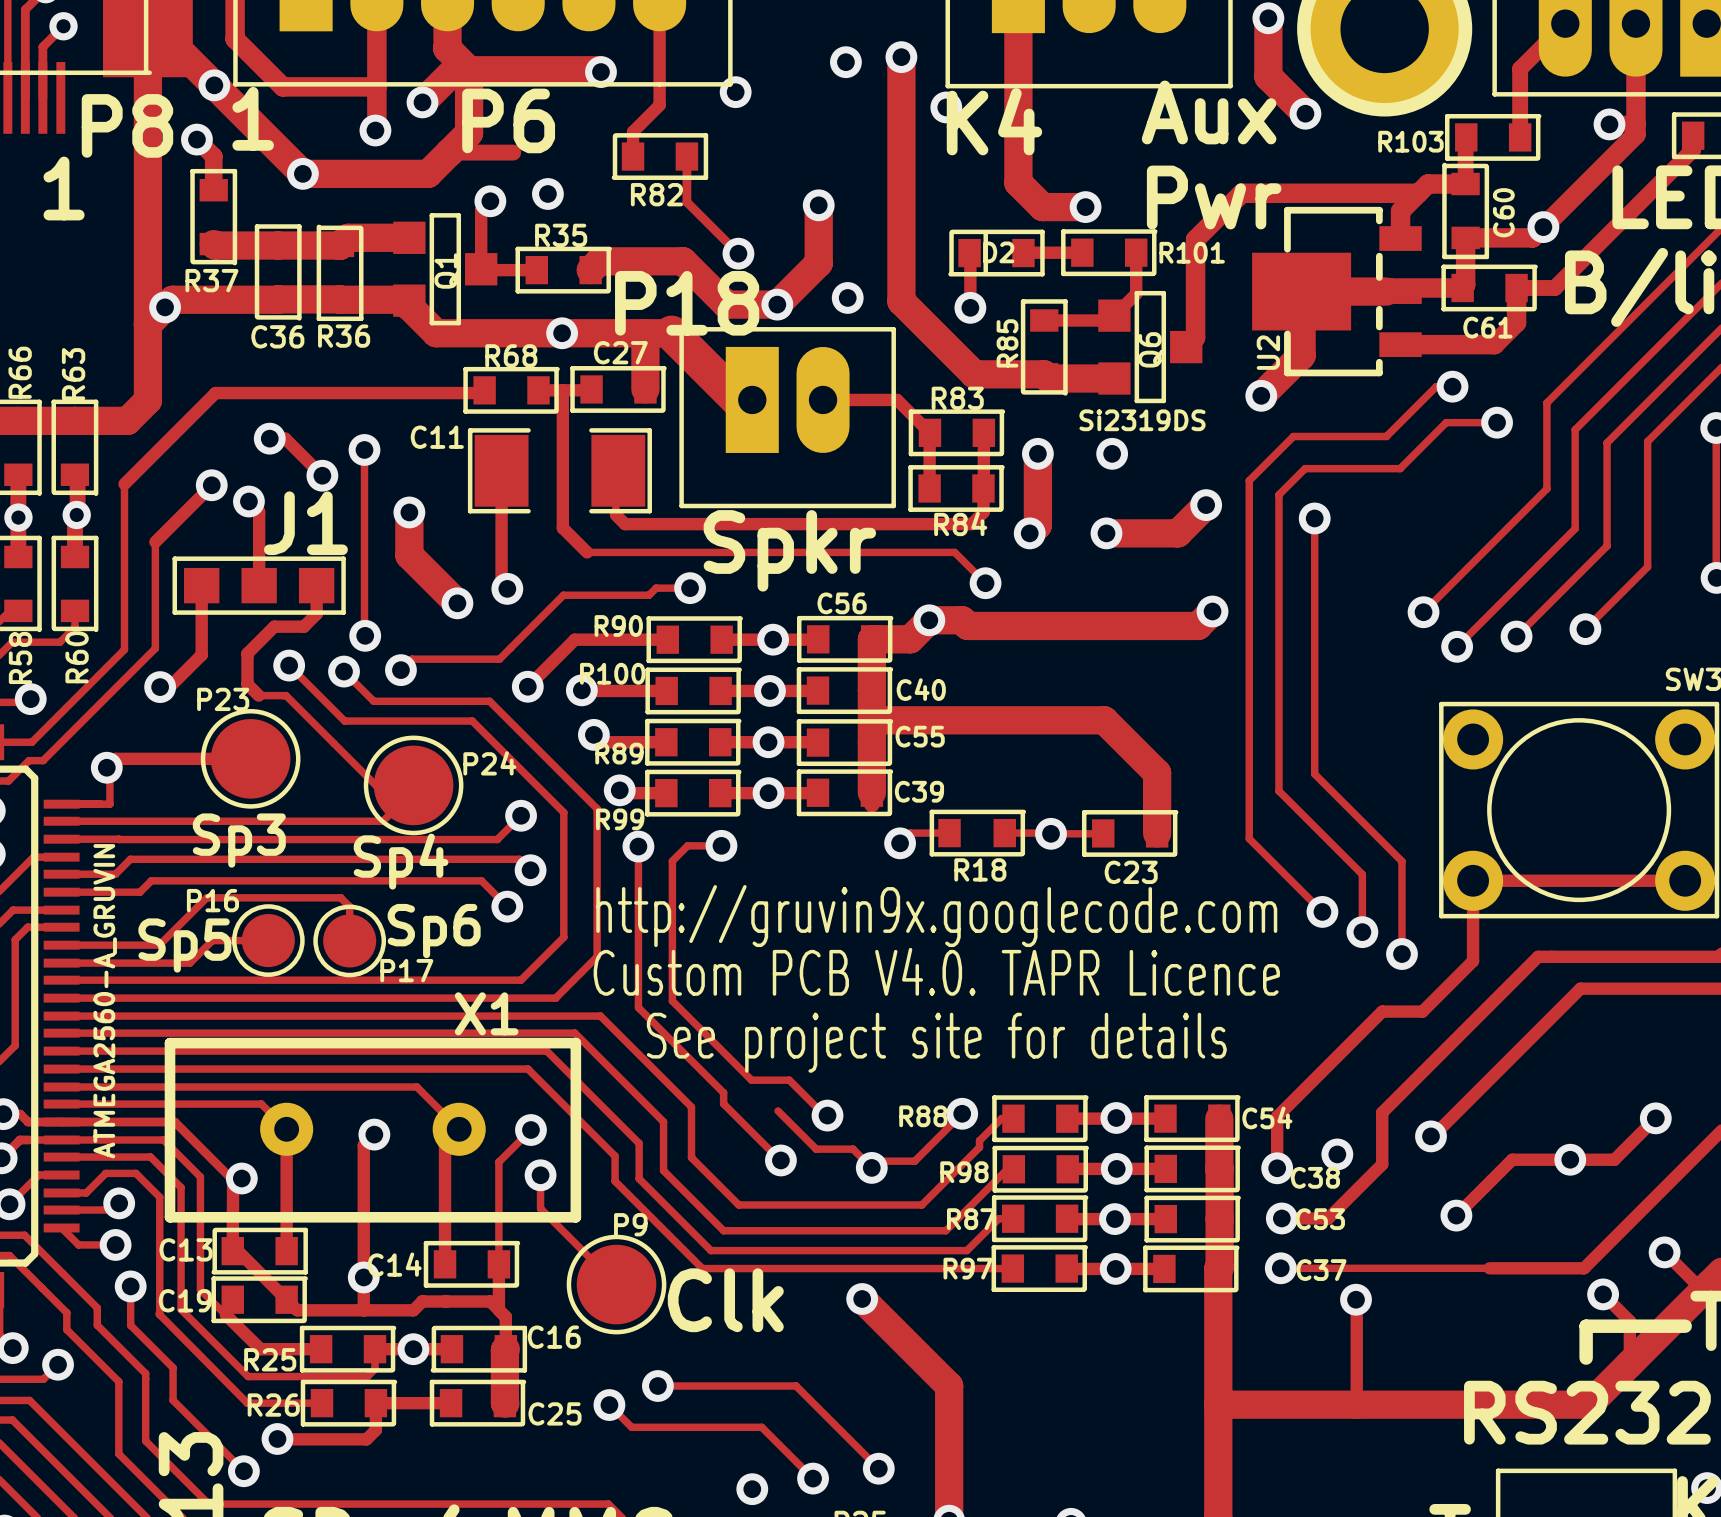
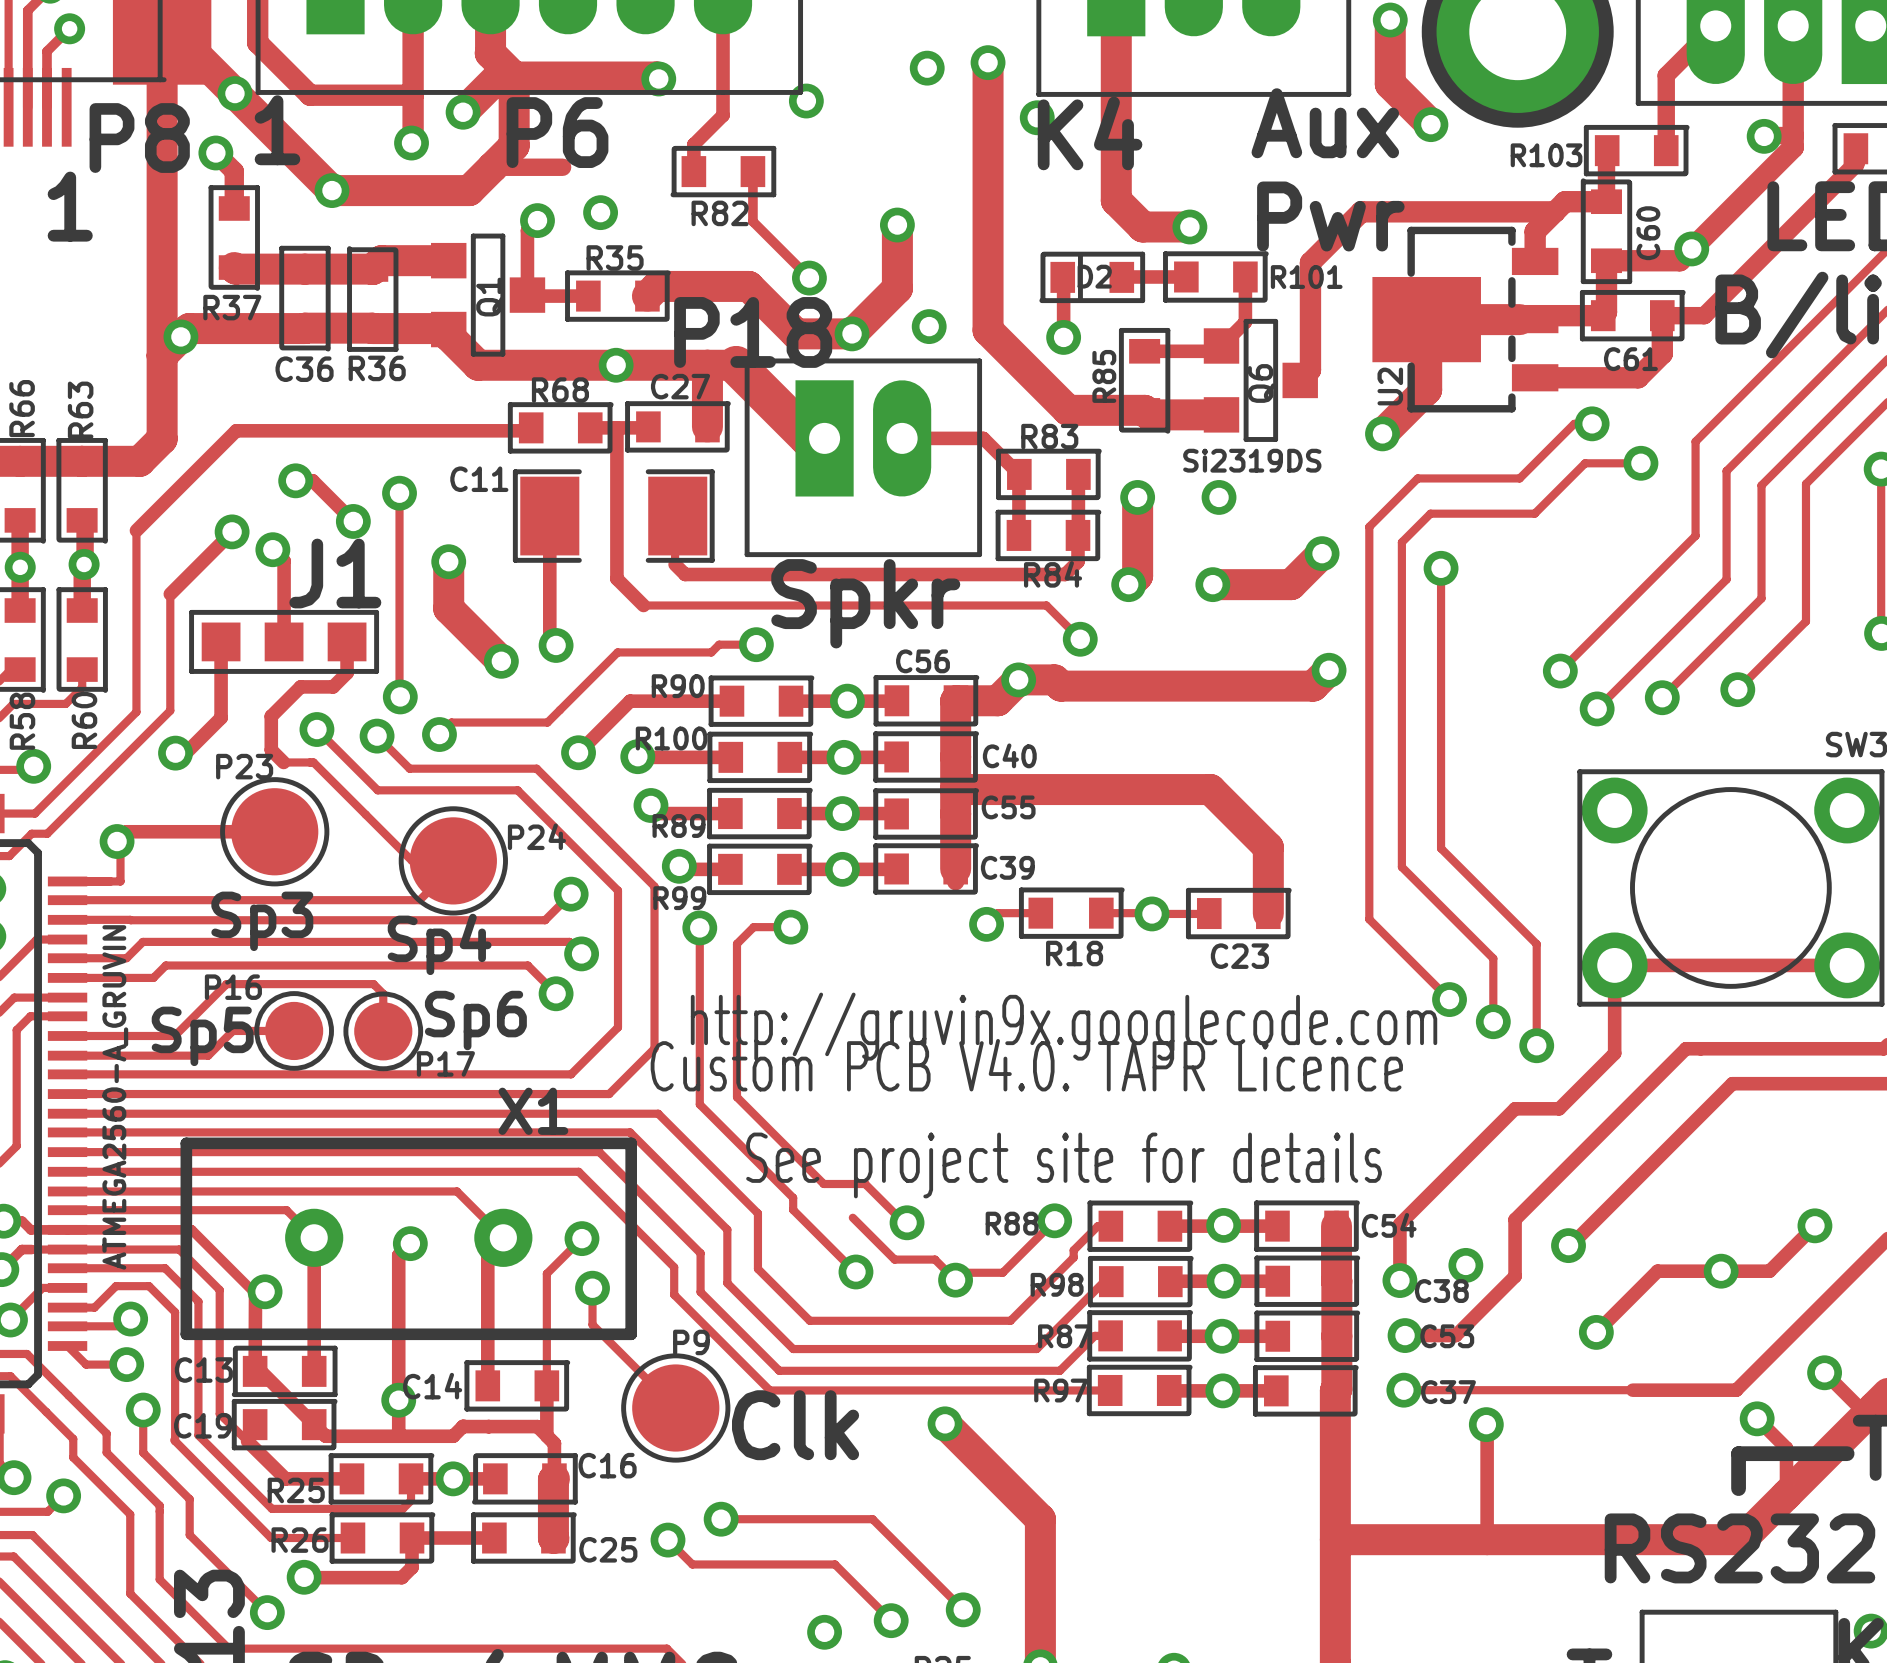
text position: http://gruvin9x.googlecode.com (936, 916) -> http://gruvin9x.googlecode.com (1064, 1026)
text position: See project site for details (936, 1042) -> See project site for details (1064, 1165)

